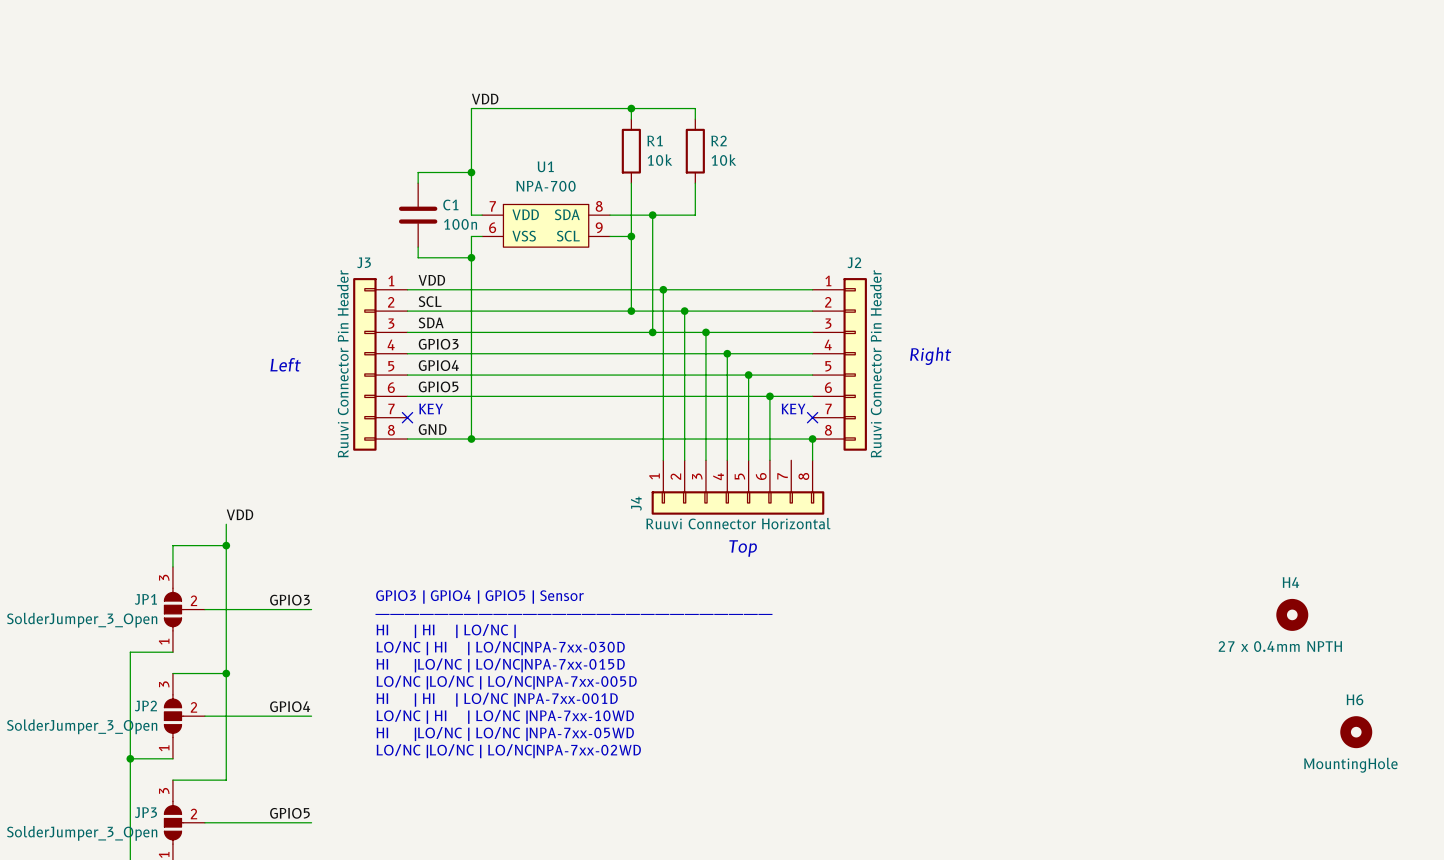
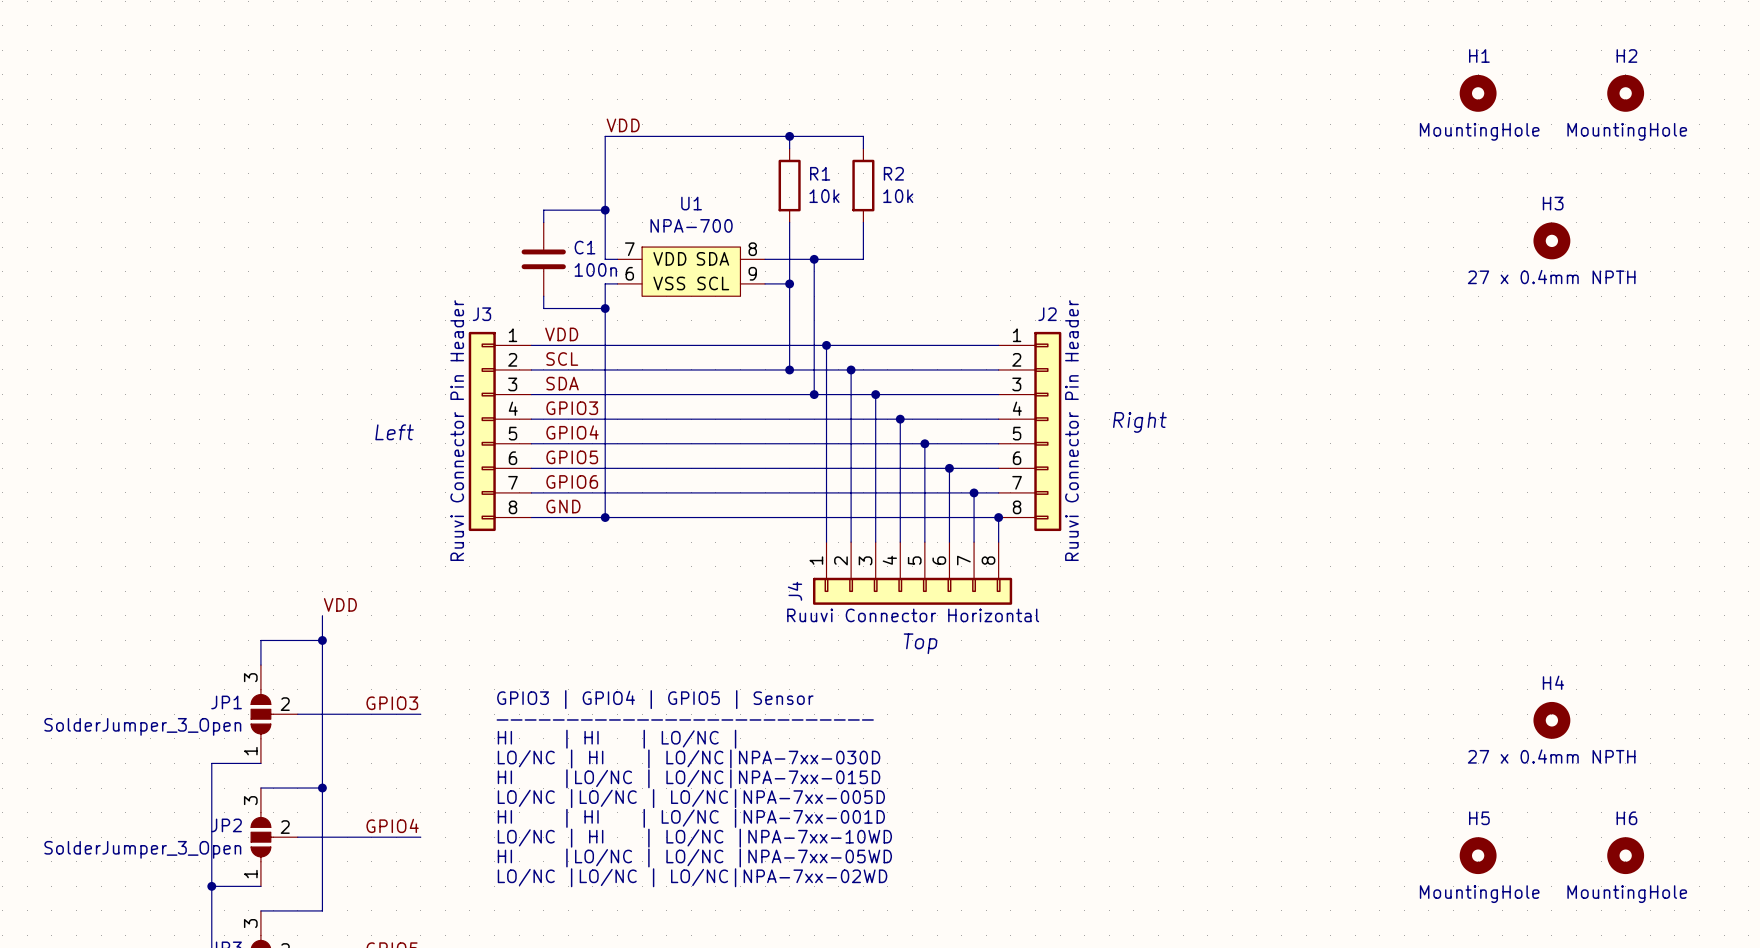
H1: none -> MountingHole (1478, 93)
H2: none -> MountingHole (1625, 93)
H3: none -> 27 x 0.4mm NPTH (1551, 240)
text: KEY (431, 408) -> none
label: none -> GPIO6 (572, 481)
text: KEY (793, 408) -> none
wire: none -> (531, 492) (998, 492)
no-connect mark: (407, 417) -> none
wire: none -> (974, 492) (974, 542)
junction: none -> (974, 492)
no-connect mark: (812, 417) -> none
H5: none -> MountingHole (1478, 855)

